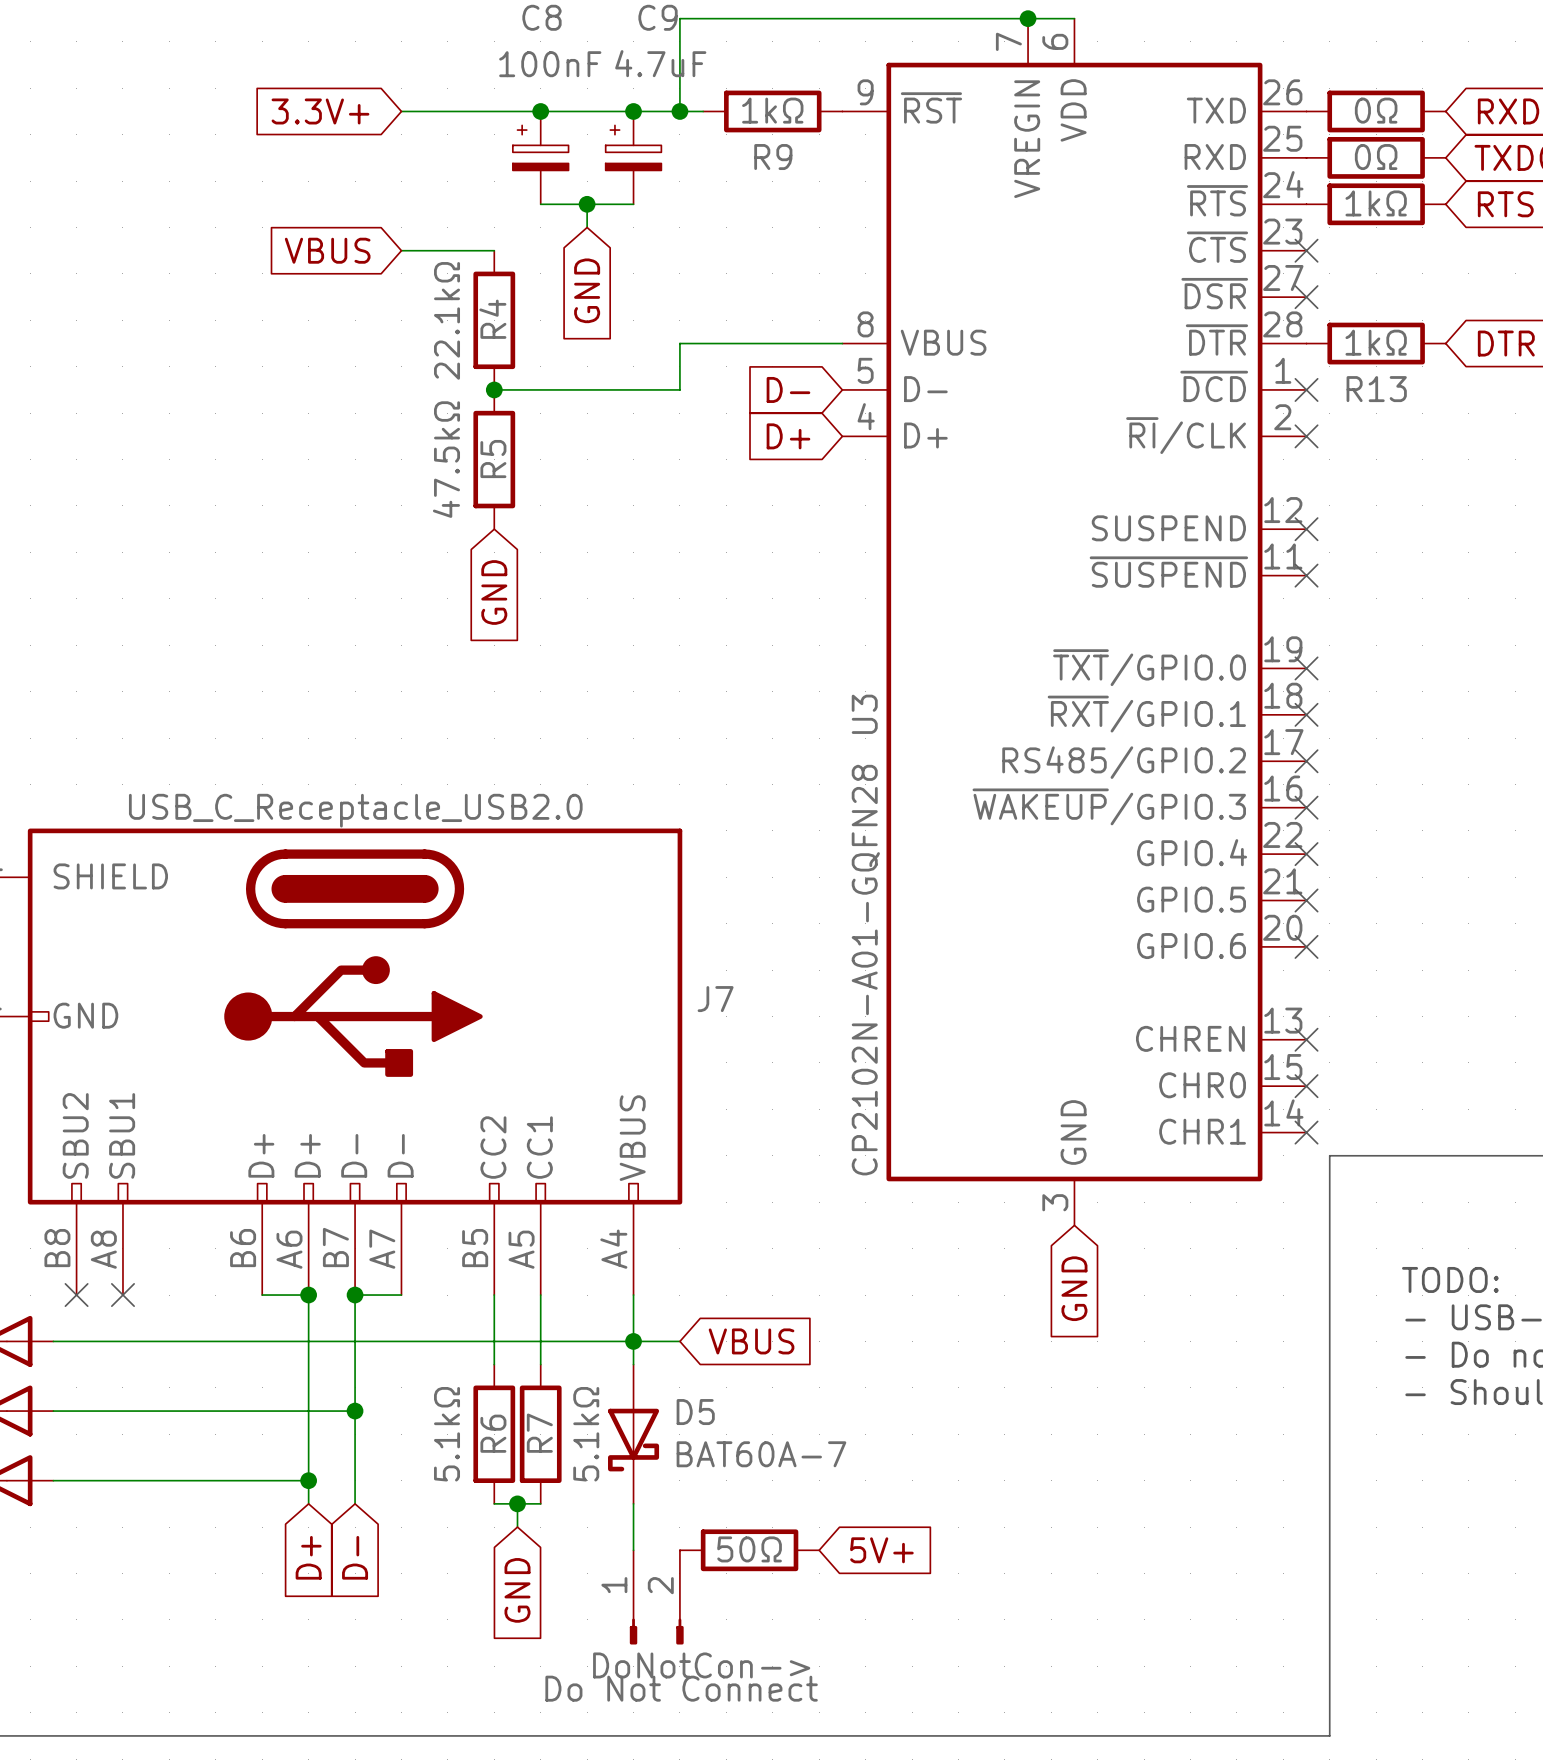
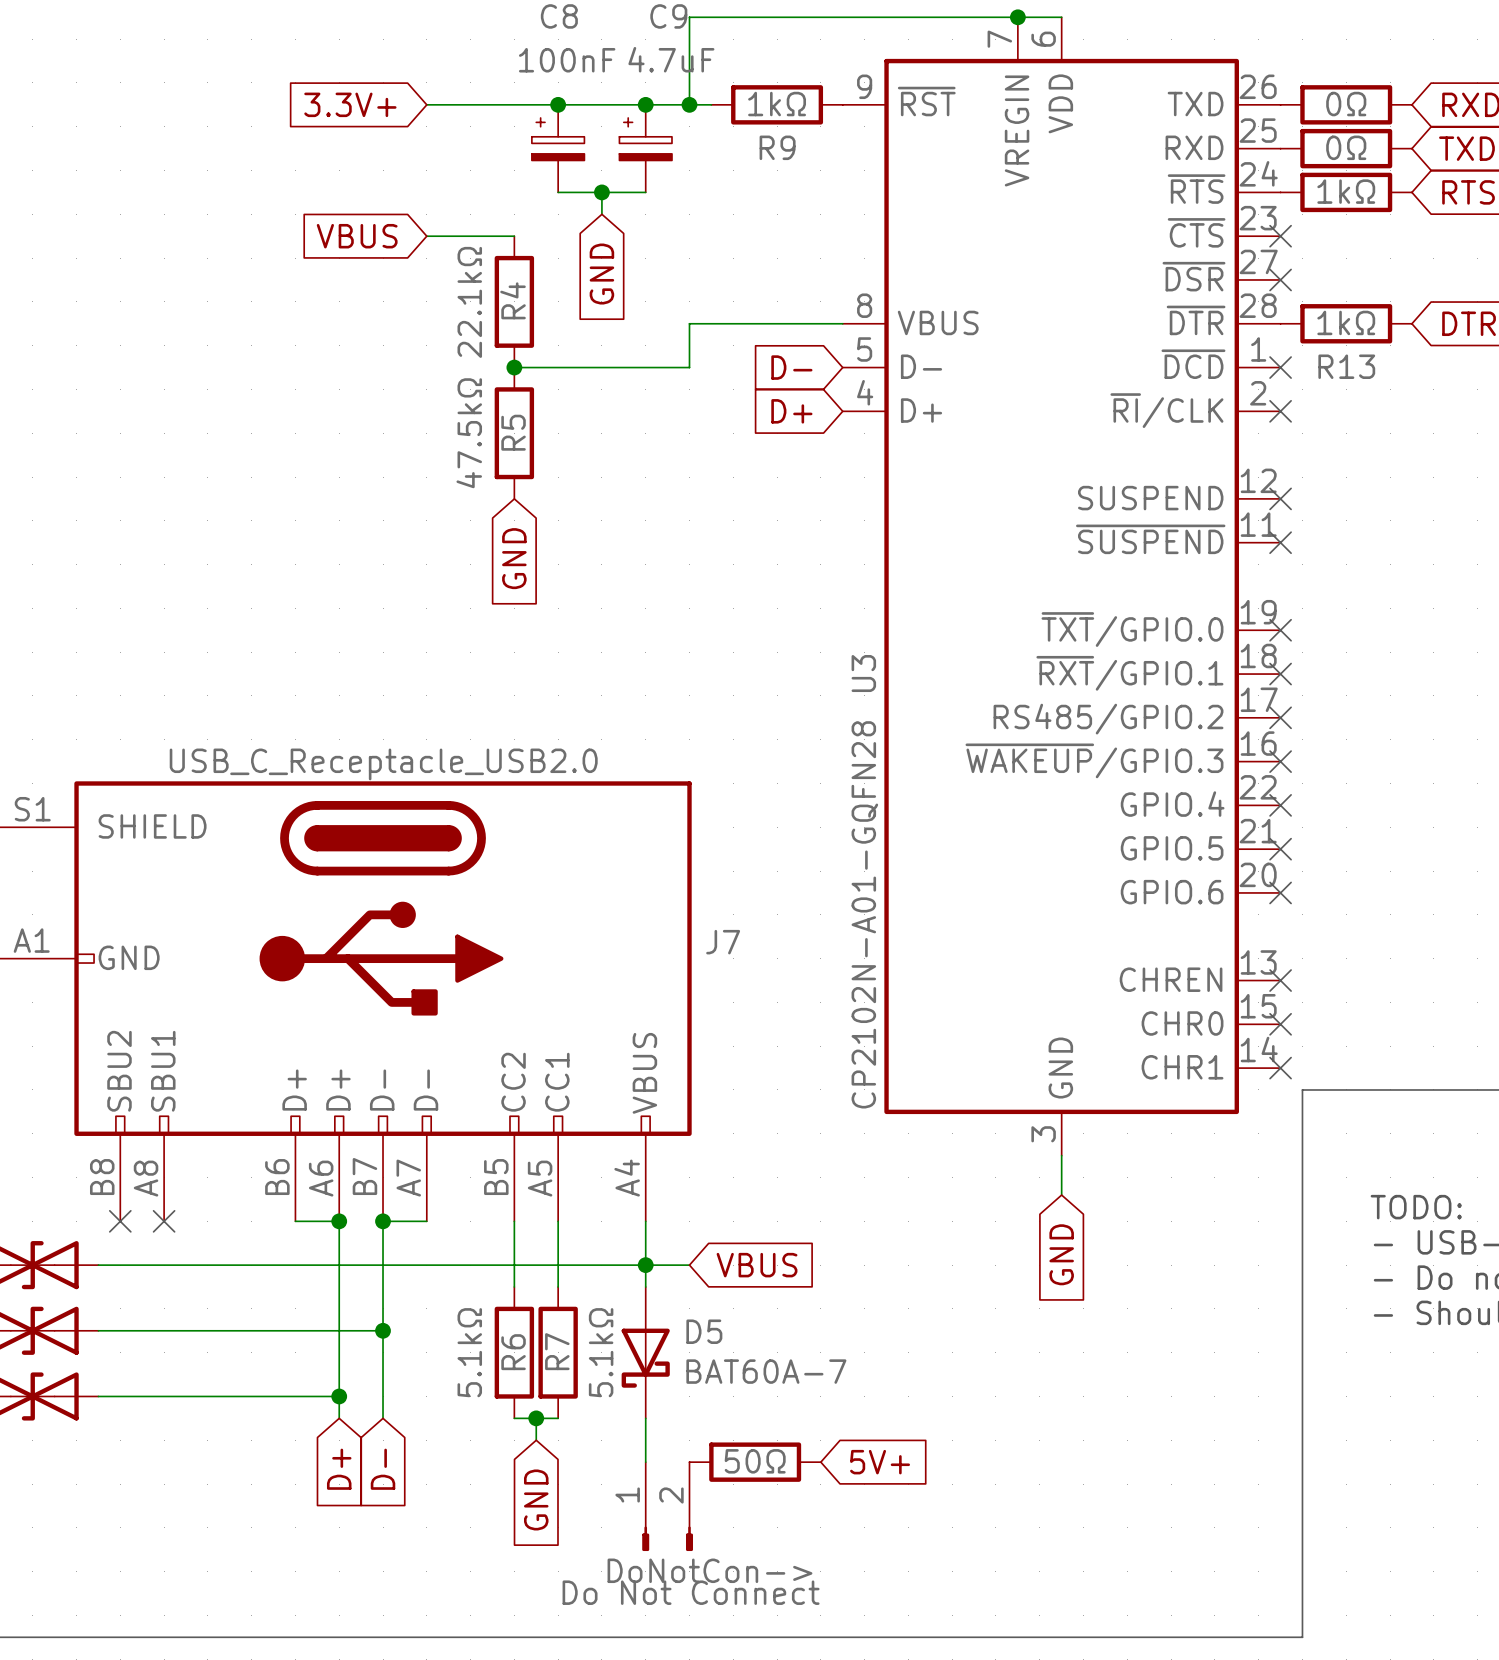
wire: none -> (1061, 1155) (1061, 1195)
global label position: GND (1074, 1288) -> GND (1061, 1254)

